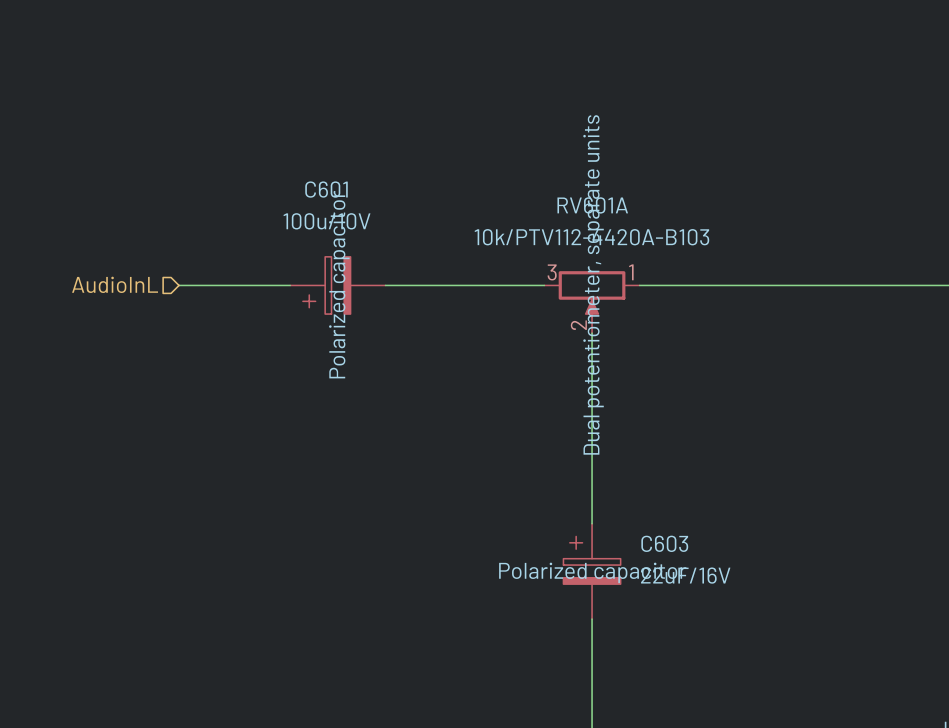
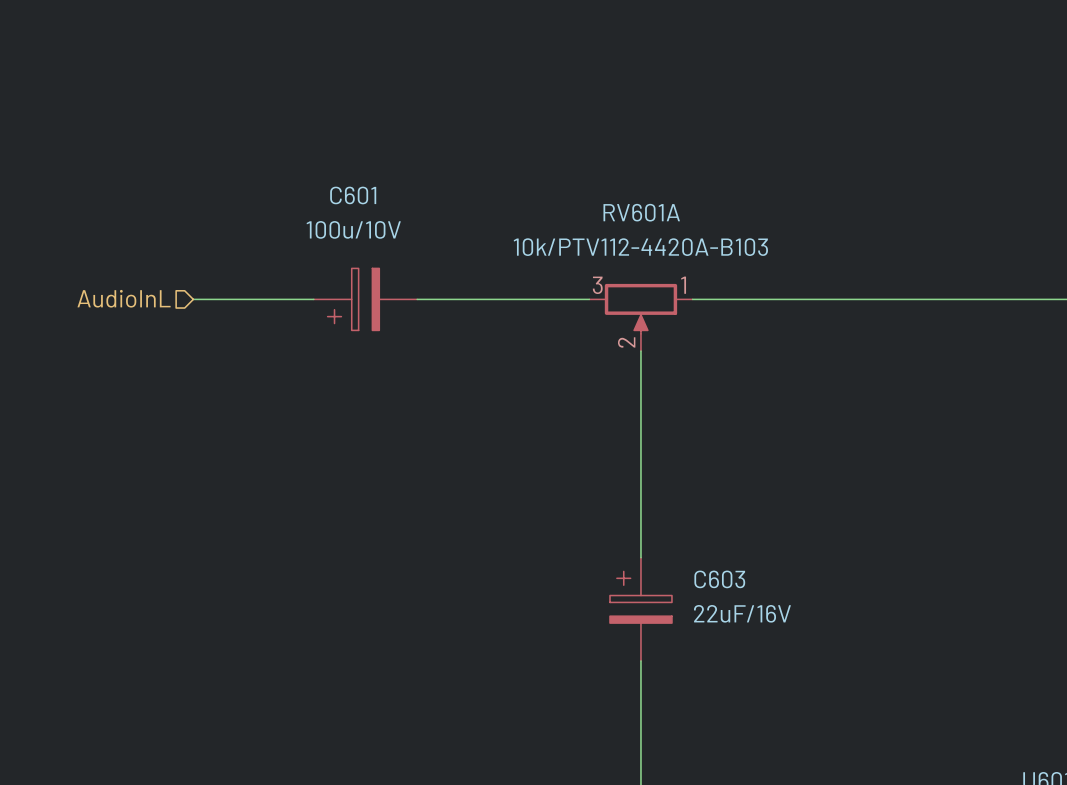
C601 text: Polarized capacitor (339, 284) -> none
RV601A text: Dual potentiometer, separate units (593, 284) -> none
C603 text: Polarized capacitor (592, 572) -> none

